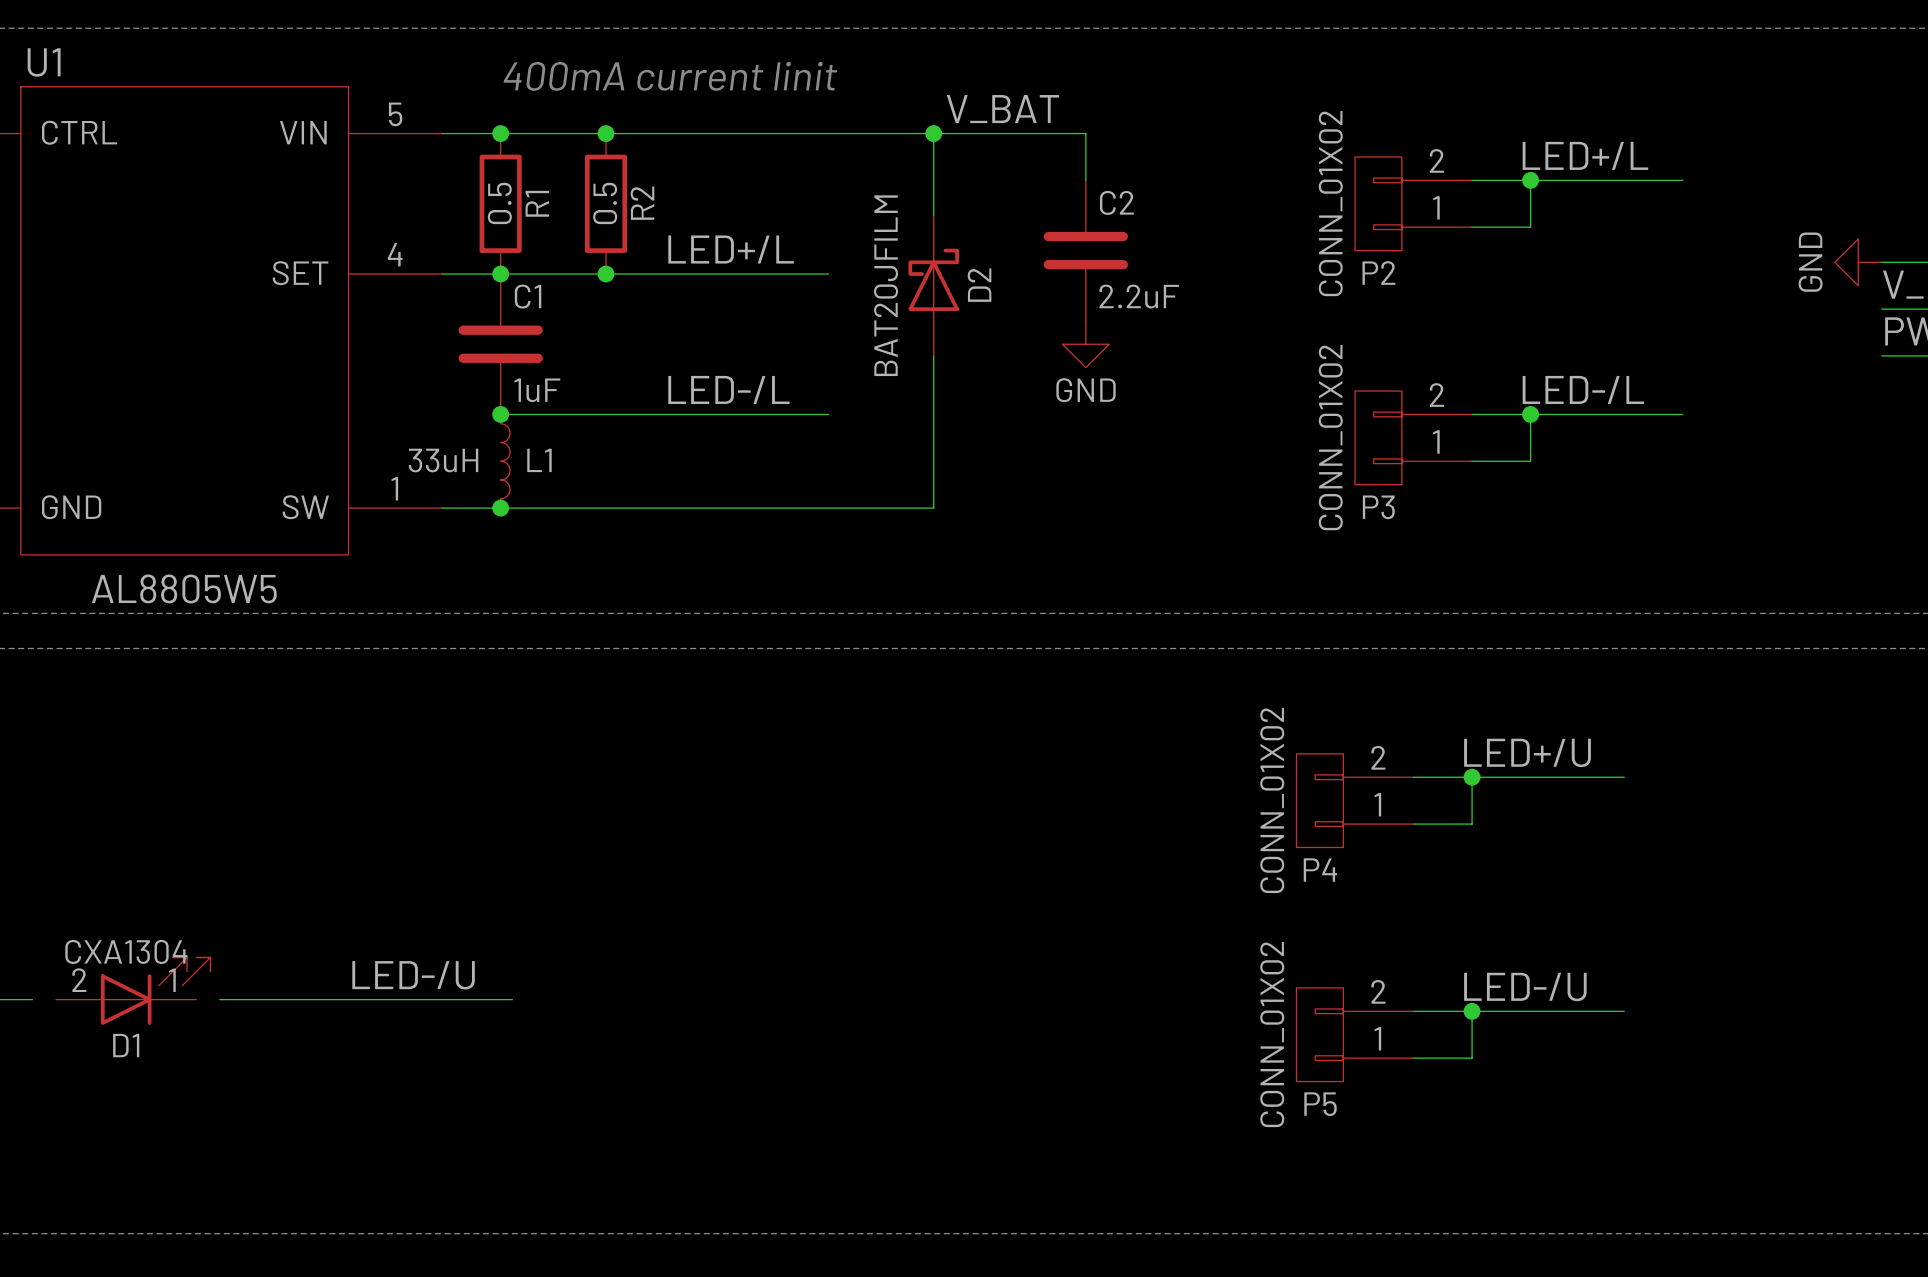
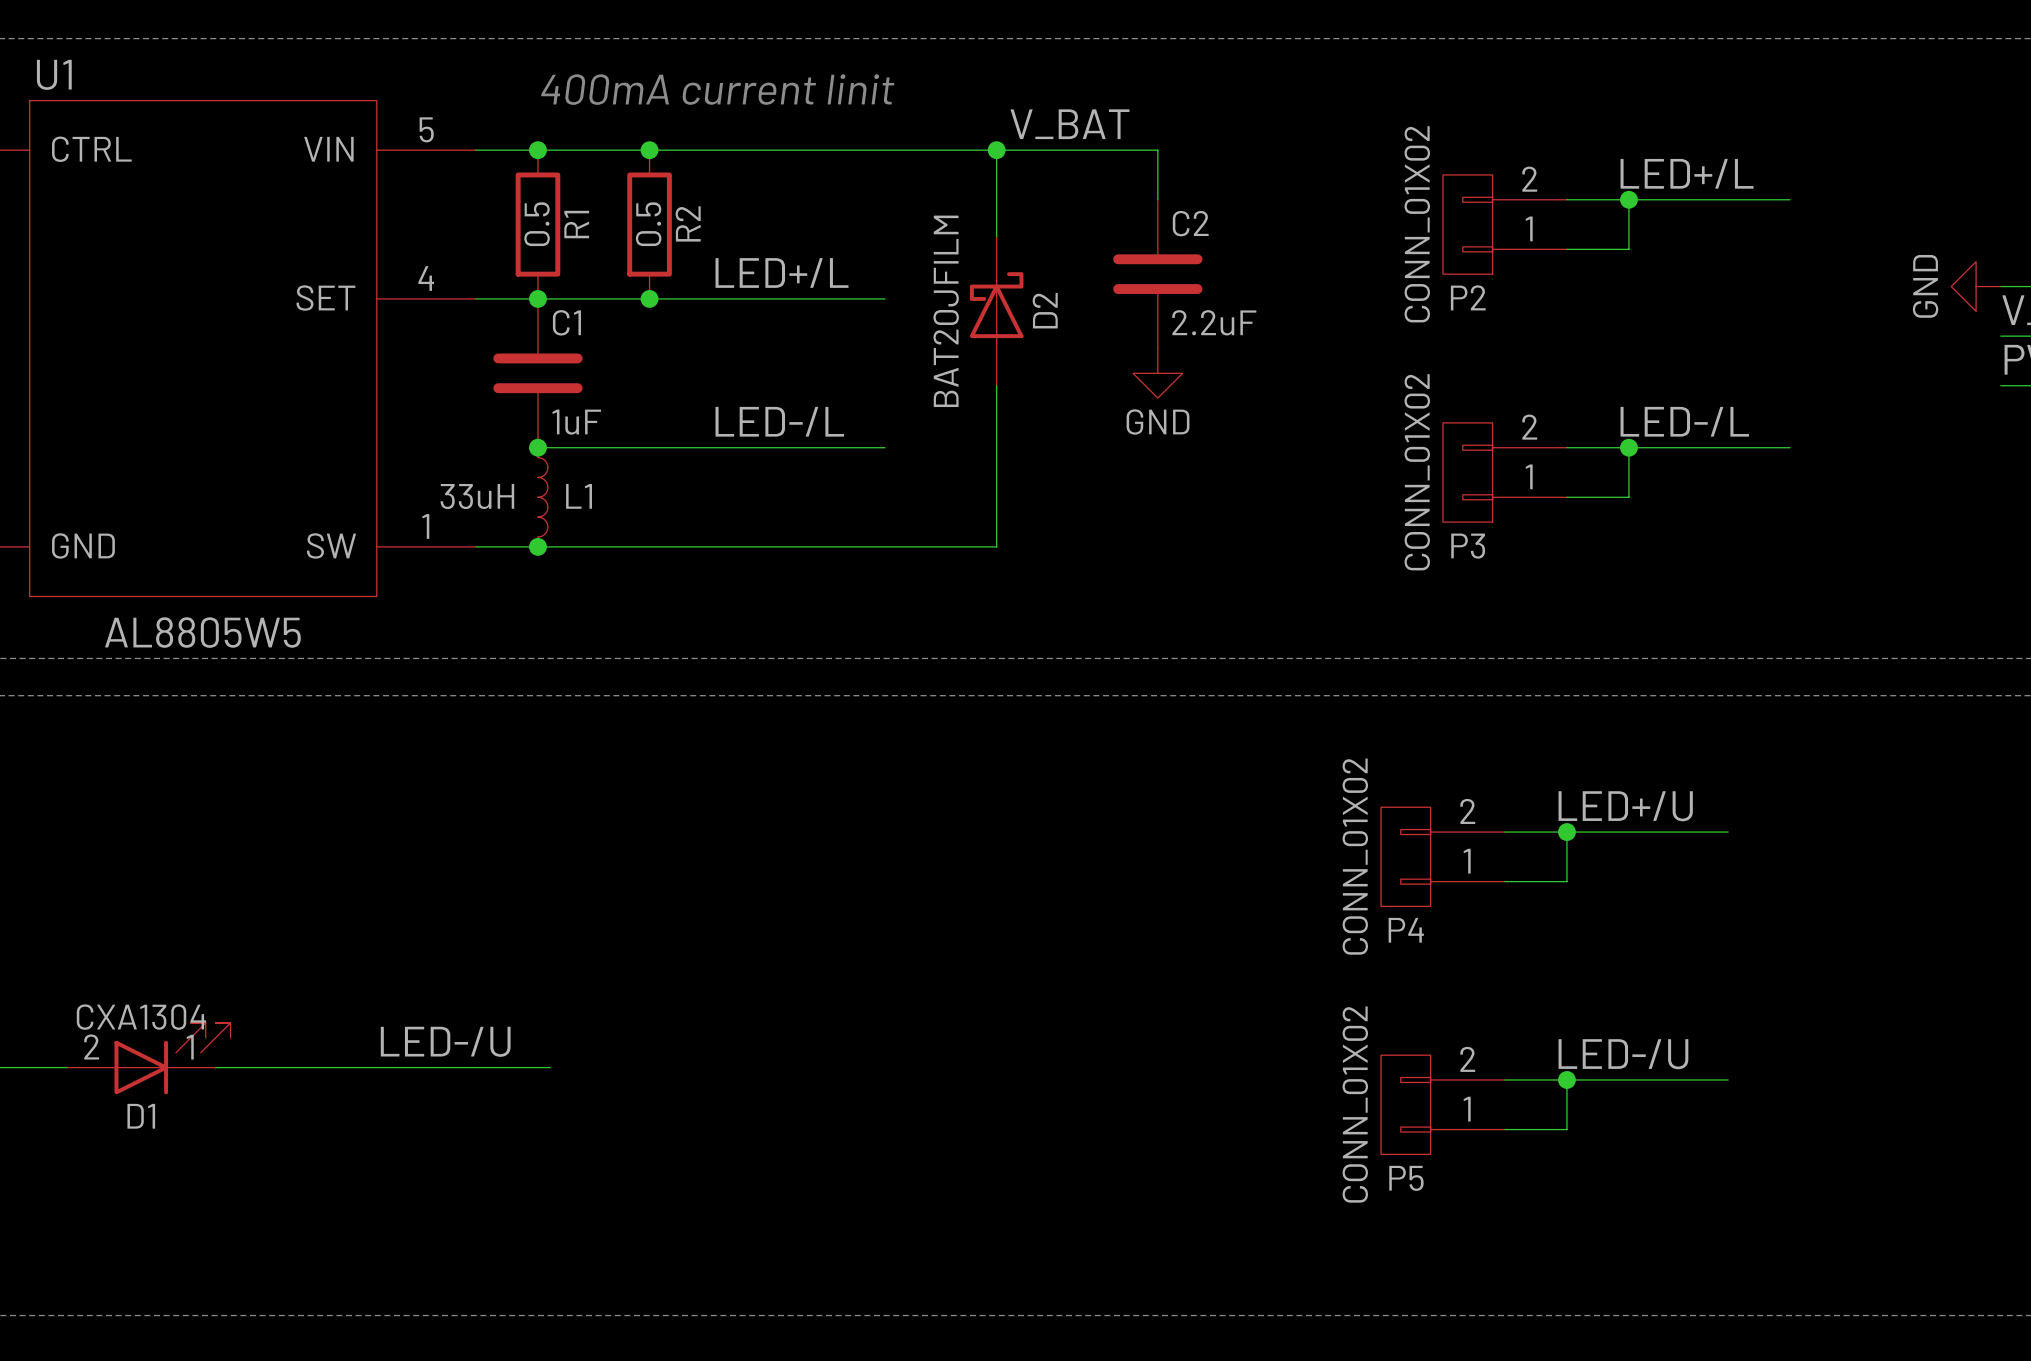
wire: none -> (42, 1067) (66, 1067)
wire: none -> (215, 1067) (240, 1067)

